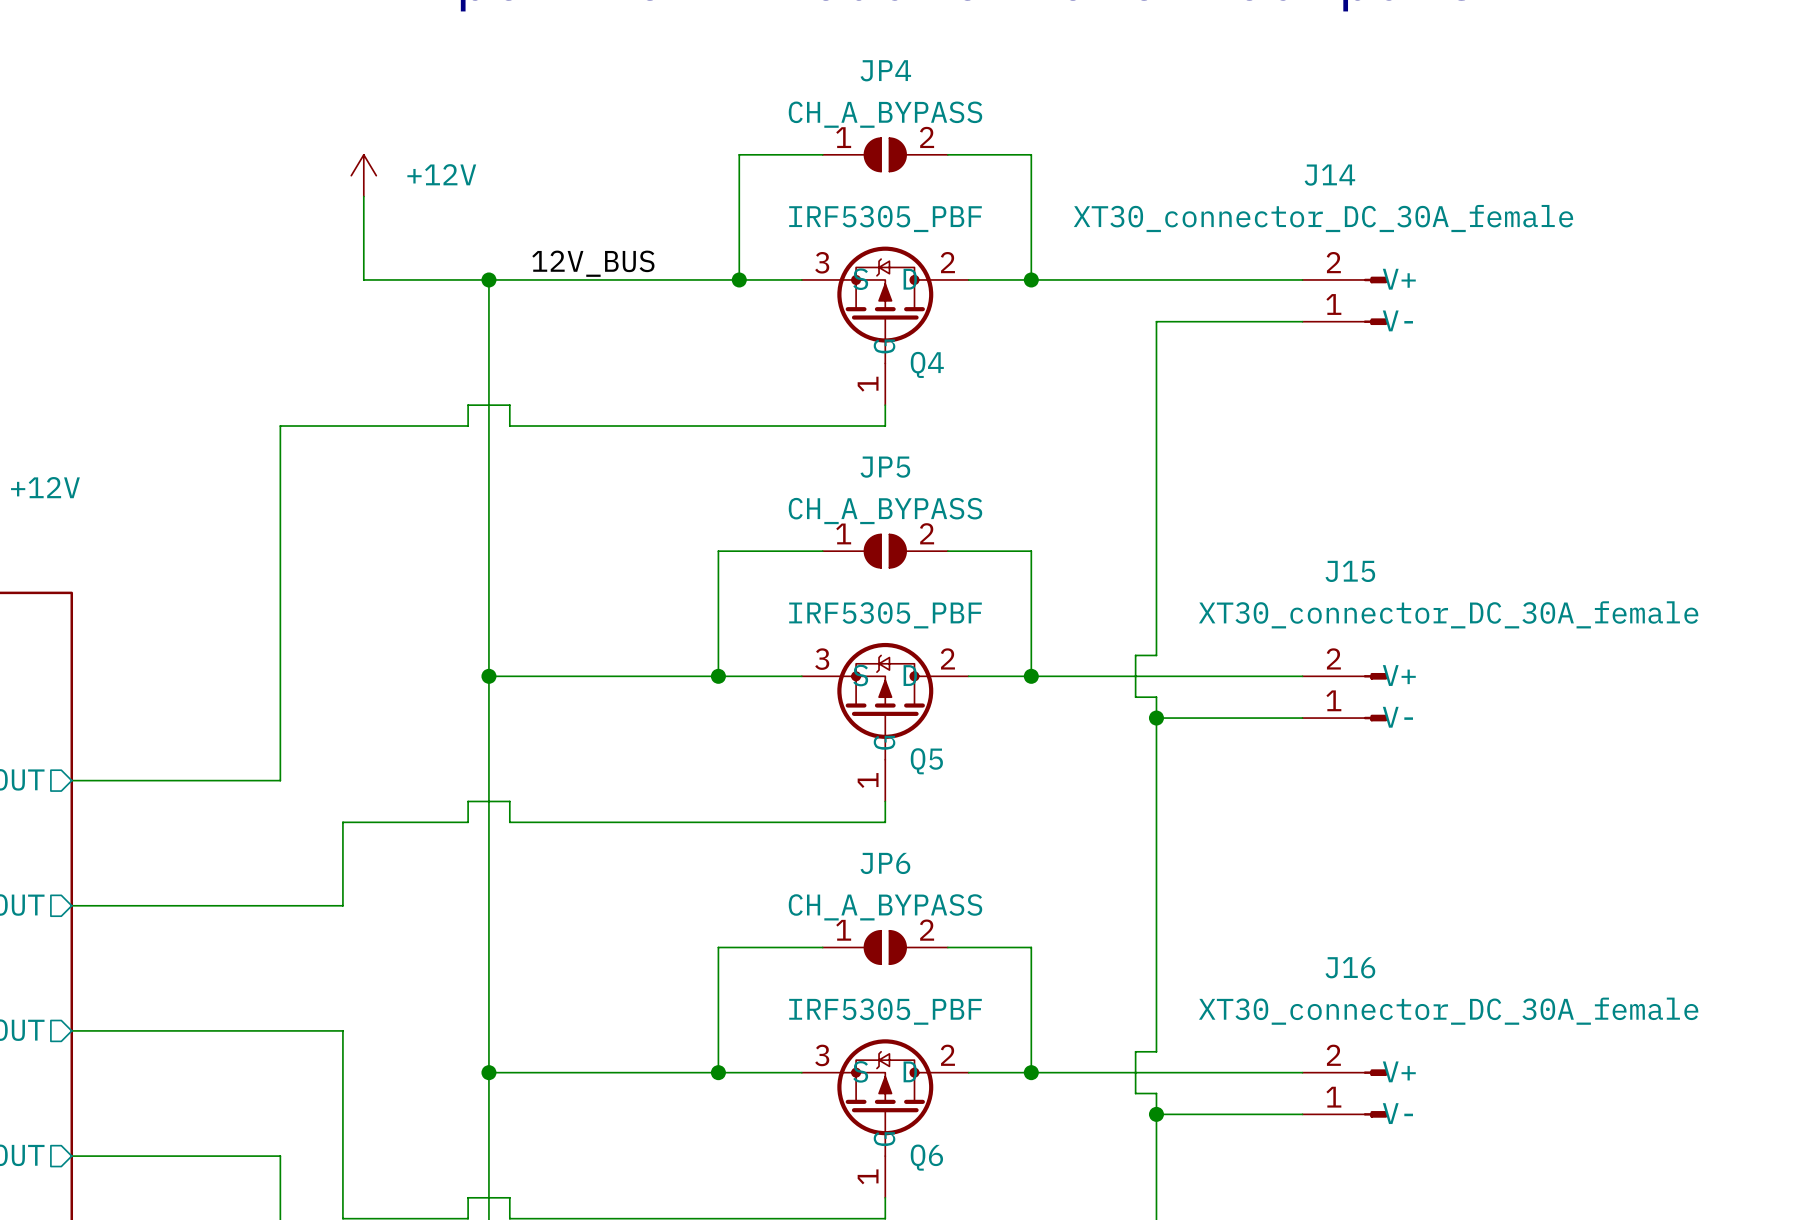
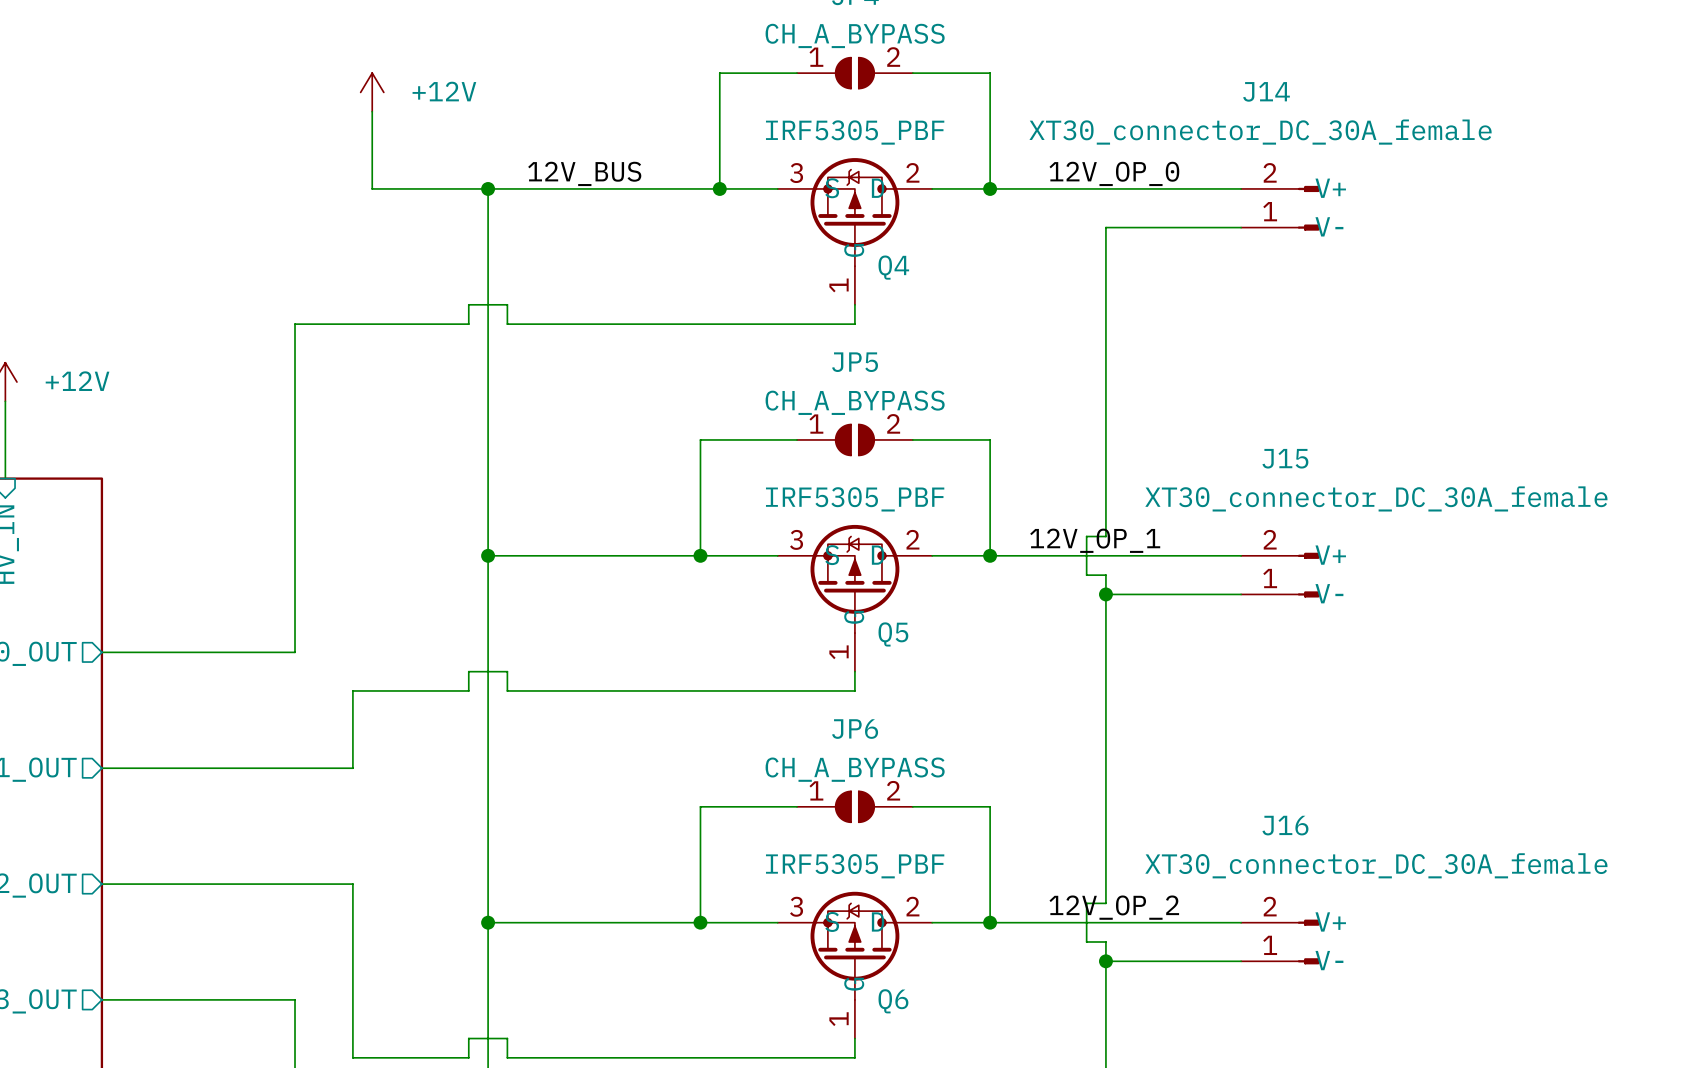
label: none -> 12V_OP_0 (1114, 173)
label: none -> 12V_OP_1 (1095, 540)
label: none -> 12V_OP_2 (1114, 907)

